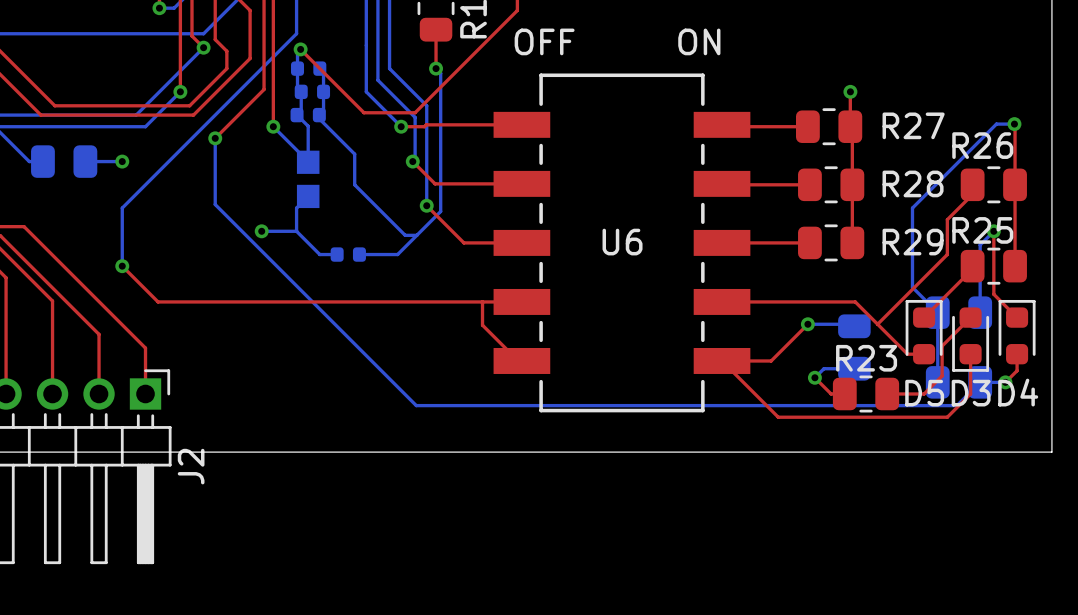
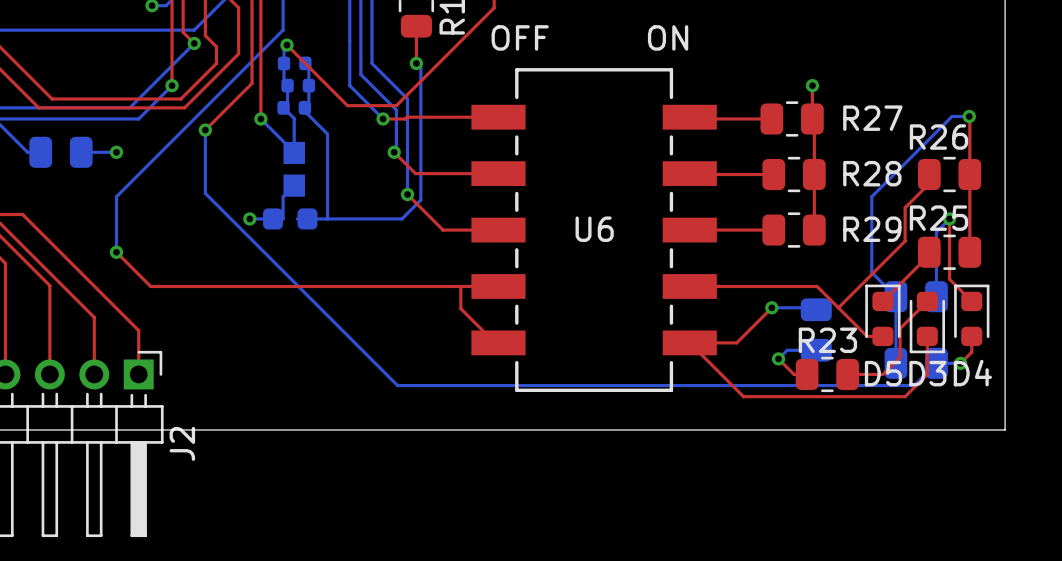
bottom track: (343, 142) (354, 154) (354, 184) (405, 235) (416, 235) -> (327, 134) (327, 218)
bottom track: (296, 231) (319, 254) (337, 254) -> none
part: none -> (290, 218)
bottom track: (420, 231) (397, 254) (359, 254) -> (401, 218) (297, 218)
part: (348, 254) -> none

